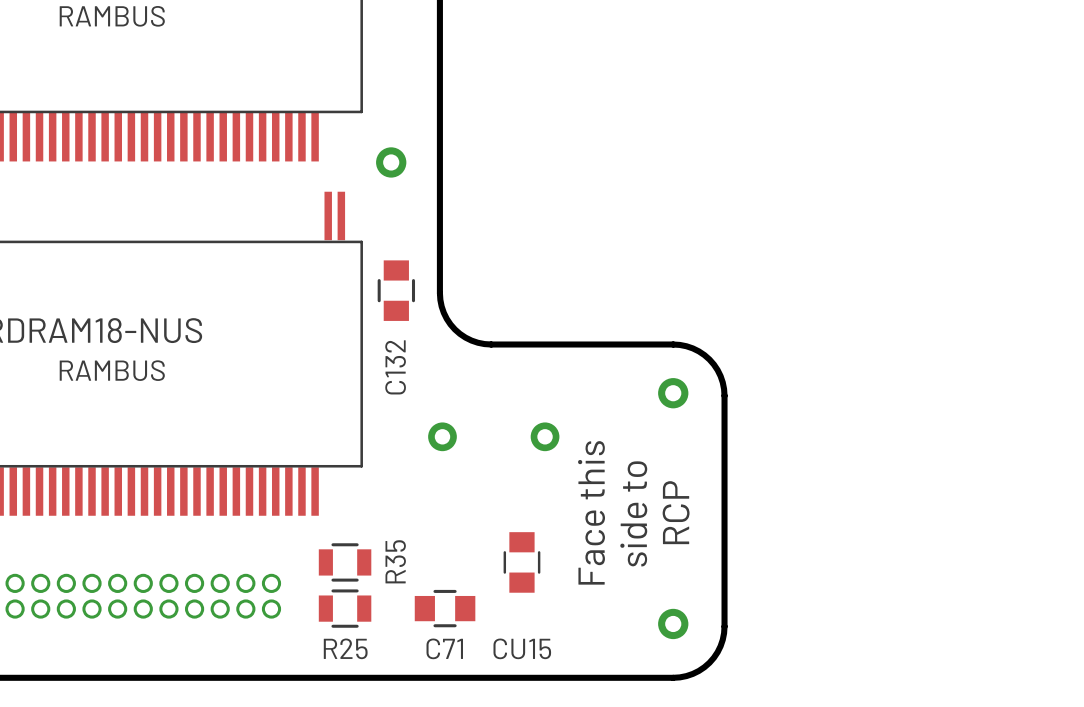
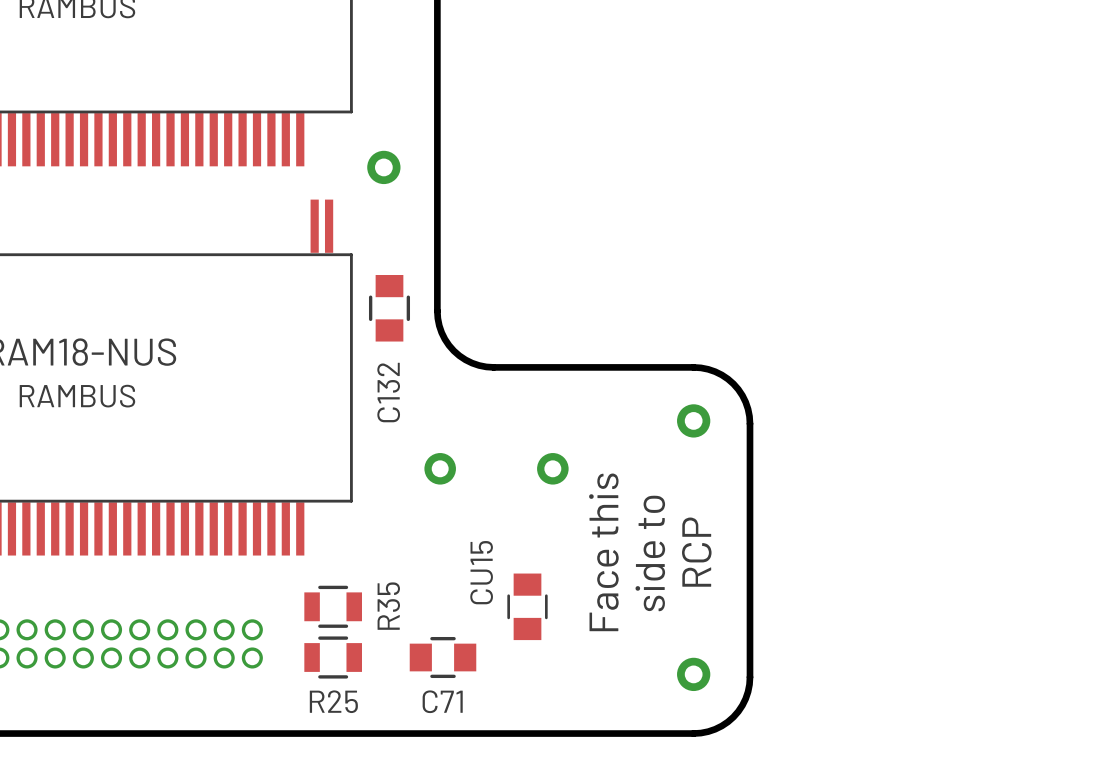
CU15 name rotation: 0° (522, 648) -> 90° counterclockwise (481, 572)
CU15 name position: CU15 (522, 648) -> CU15 (481, 572)

